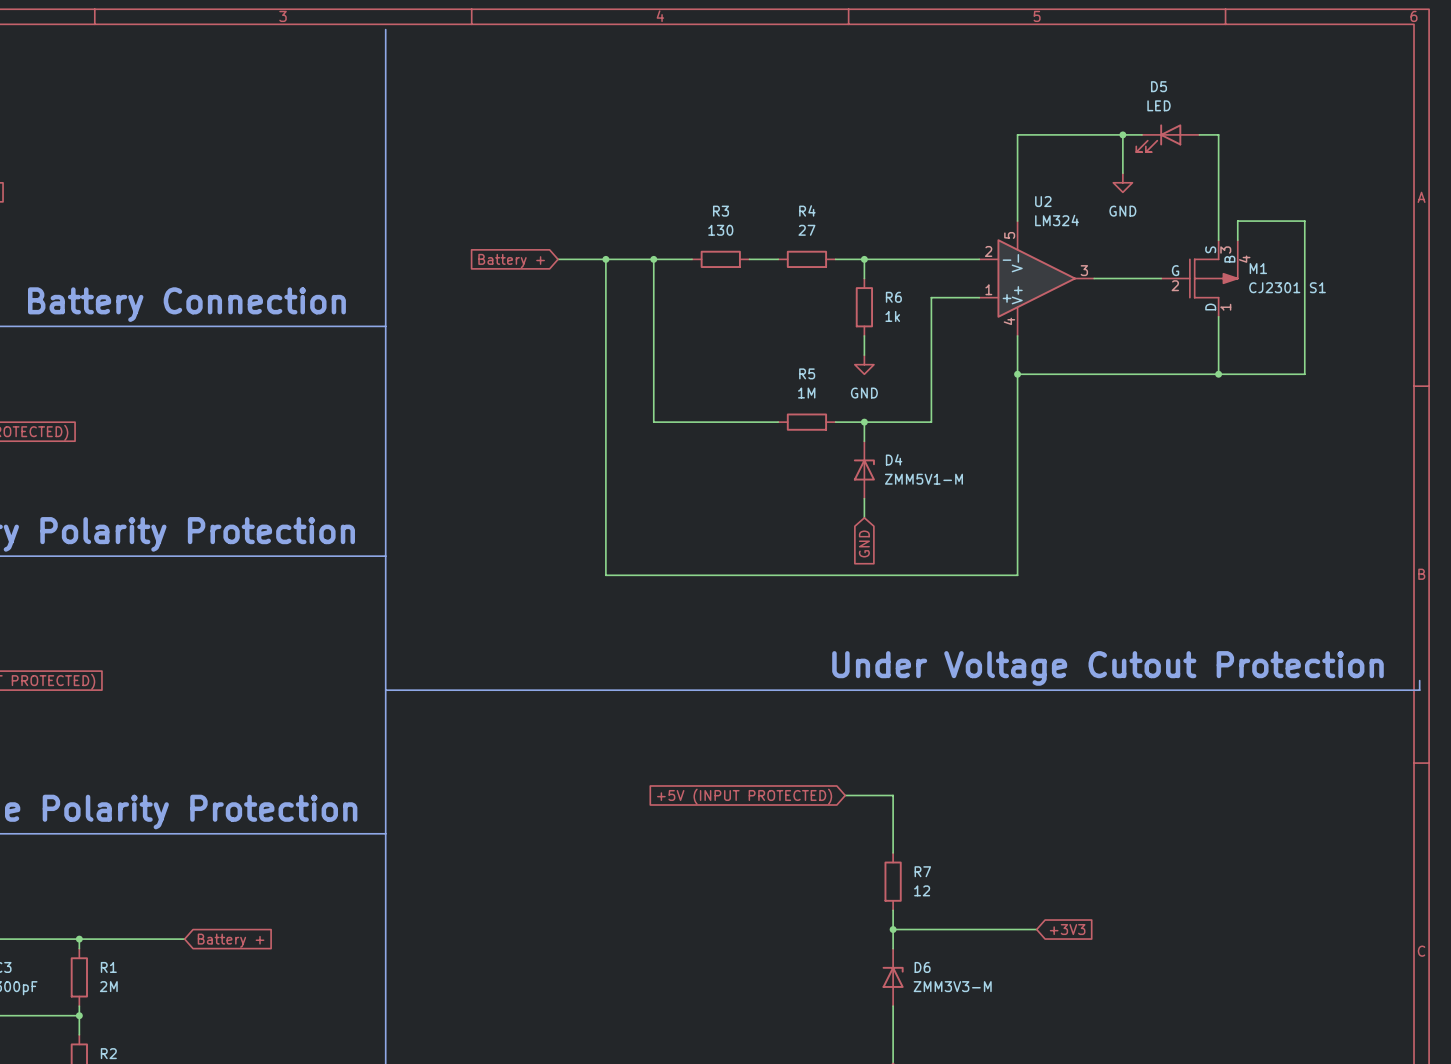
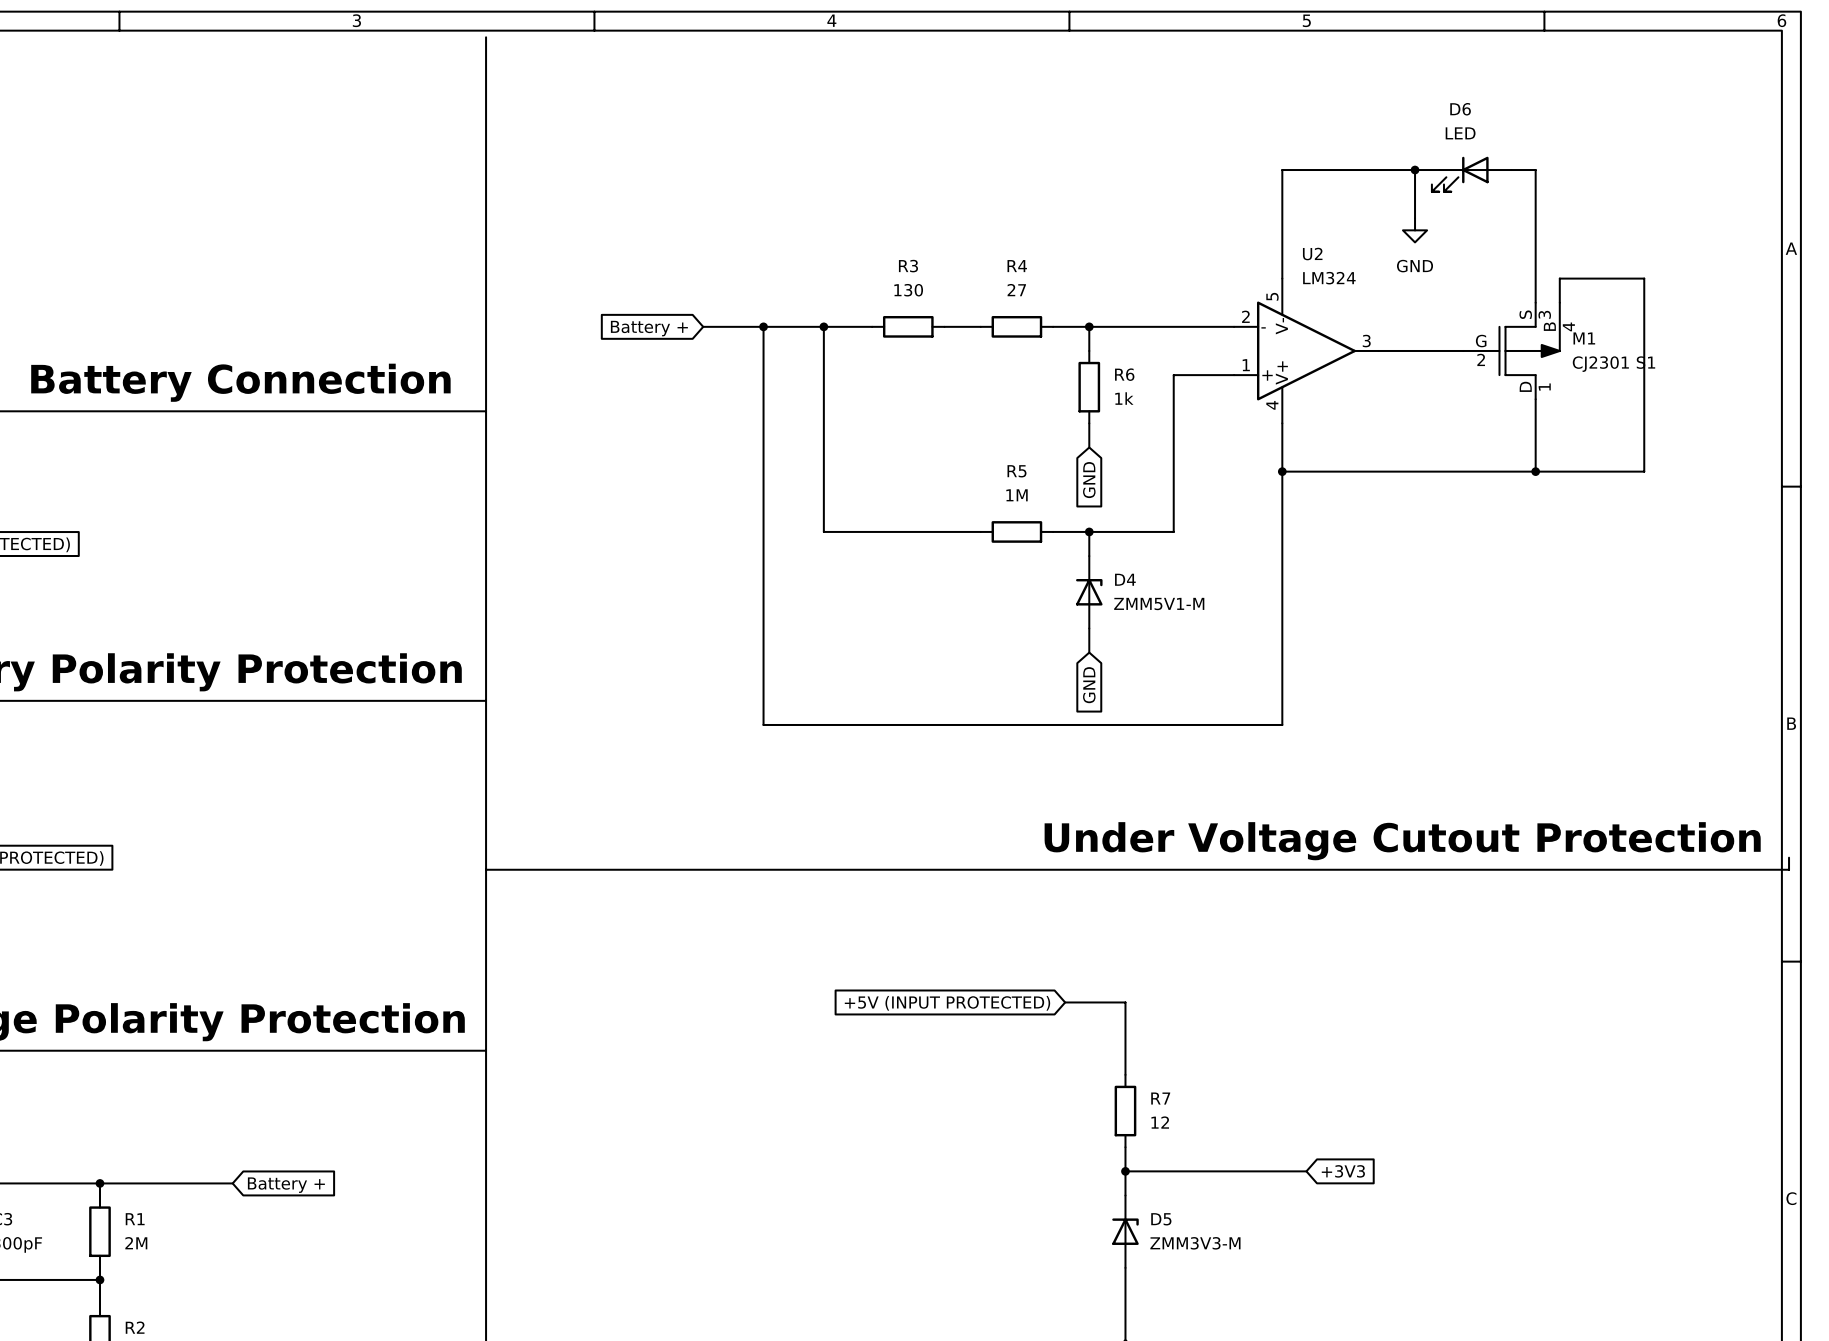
D5 name: D5 (1159, 86) -> D6 (1460, 109)
power symbol: GND (864, 364) -> none
global label: none -> GND (1089, 480)
D6 name: D6 (922, 967) -> D5 (1161, 1219)

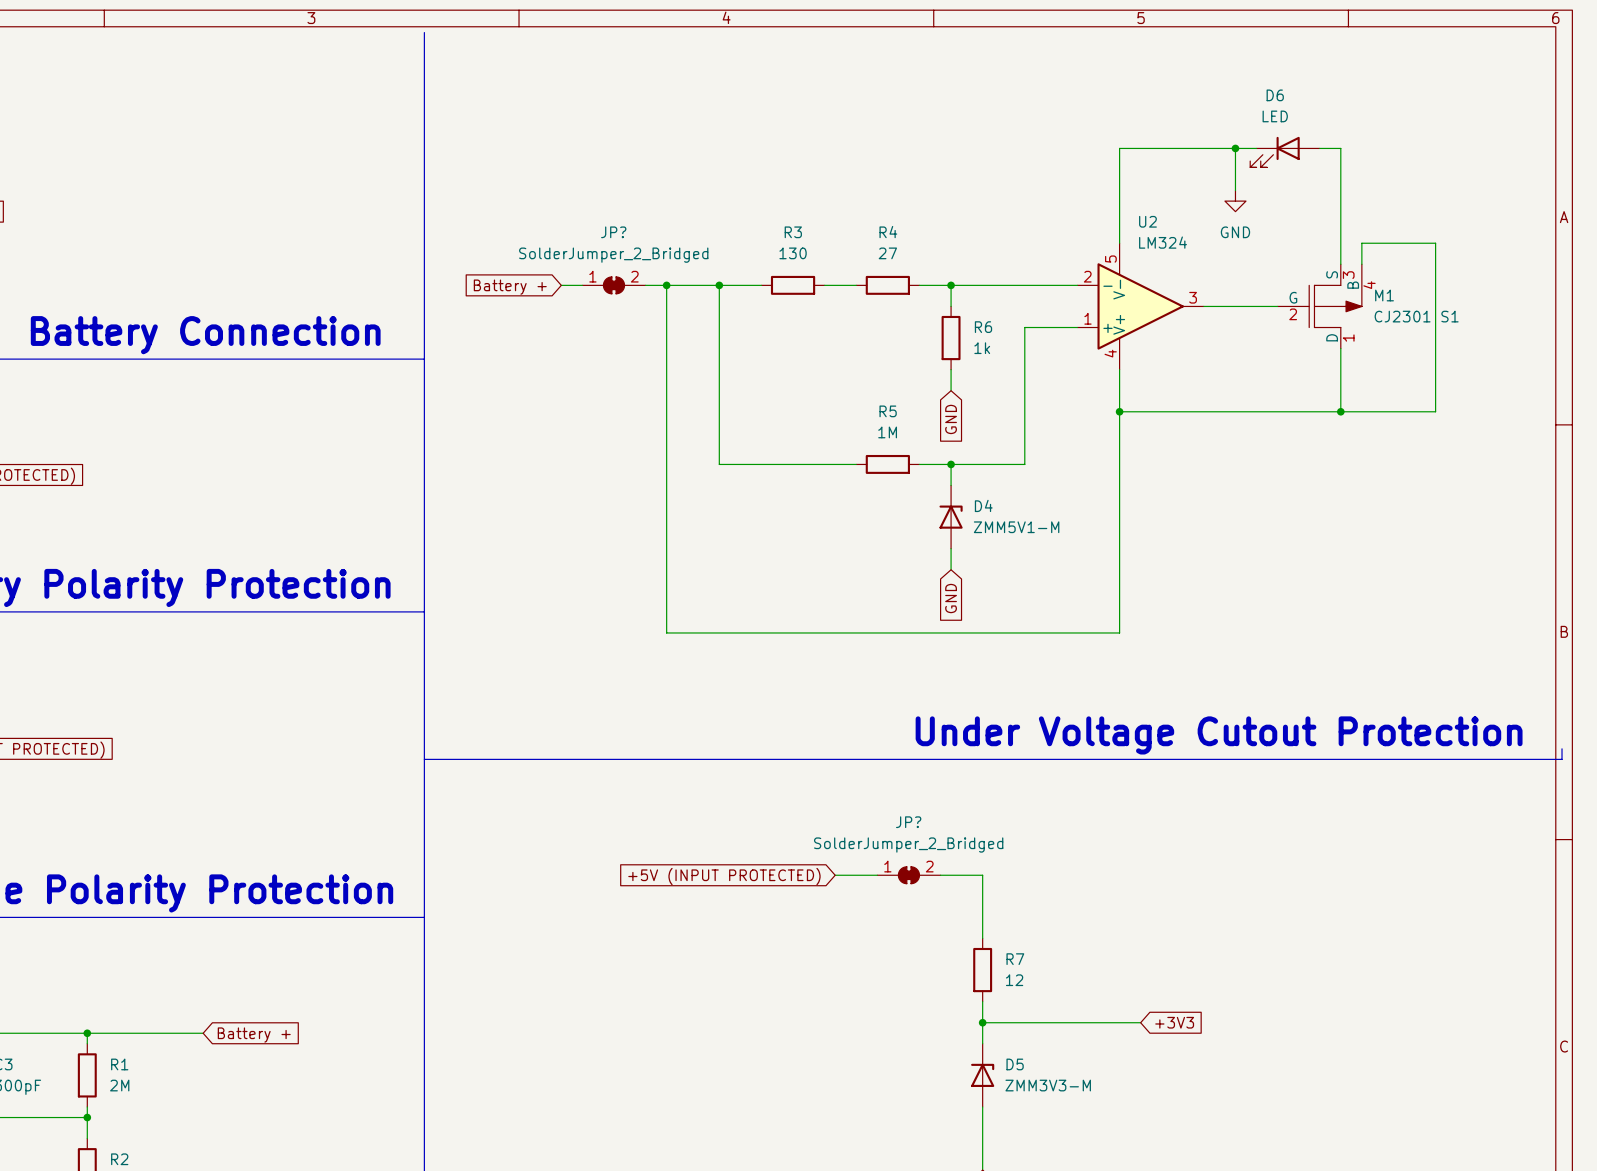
wire: none -> (561, 285) (582, 285)
JP?: none -> SolderJumper_2_Bridged (613, 285)
global label position: Battery + (649, 328) -> Battery + (510, 287)
wire: none -> (835, 875) (877, 875)
JP?: none -> SolderJumper_2_Bridged (908, 875)
global label position: +5V (INPUT PROTECTED) (947, 1003) -> +5V (INPUT PROTECTED) (724, 876)

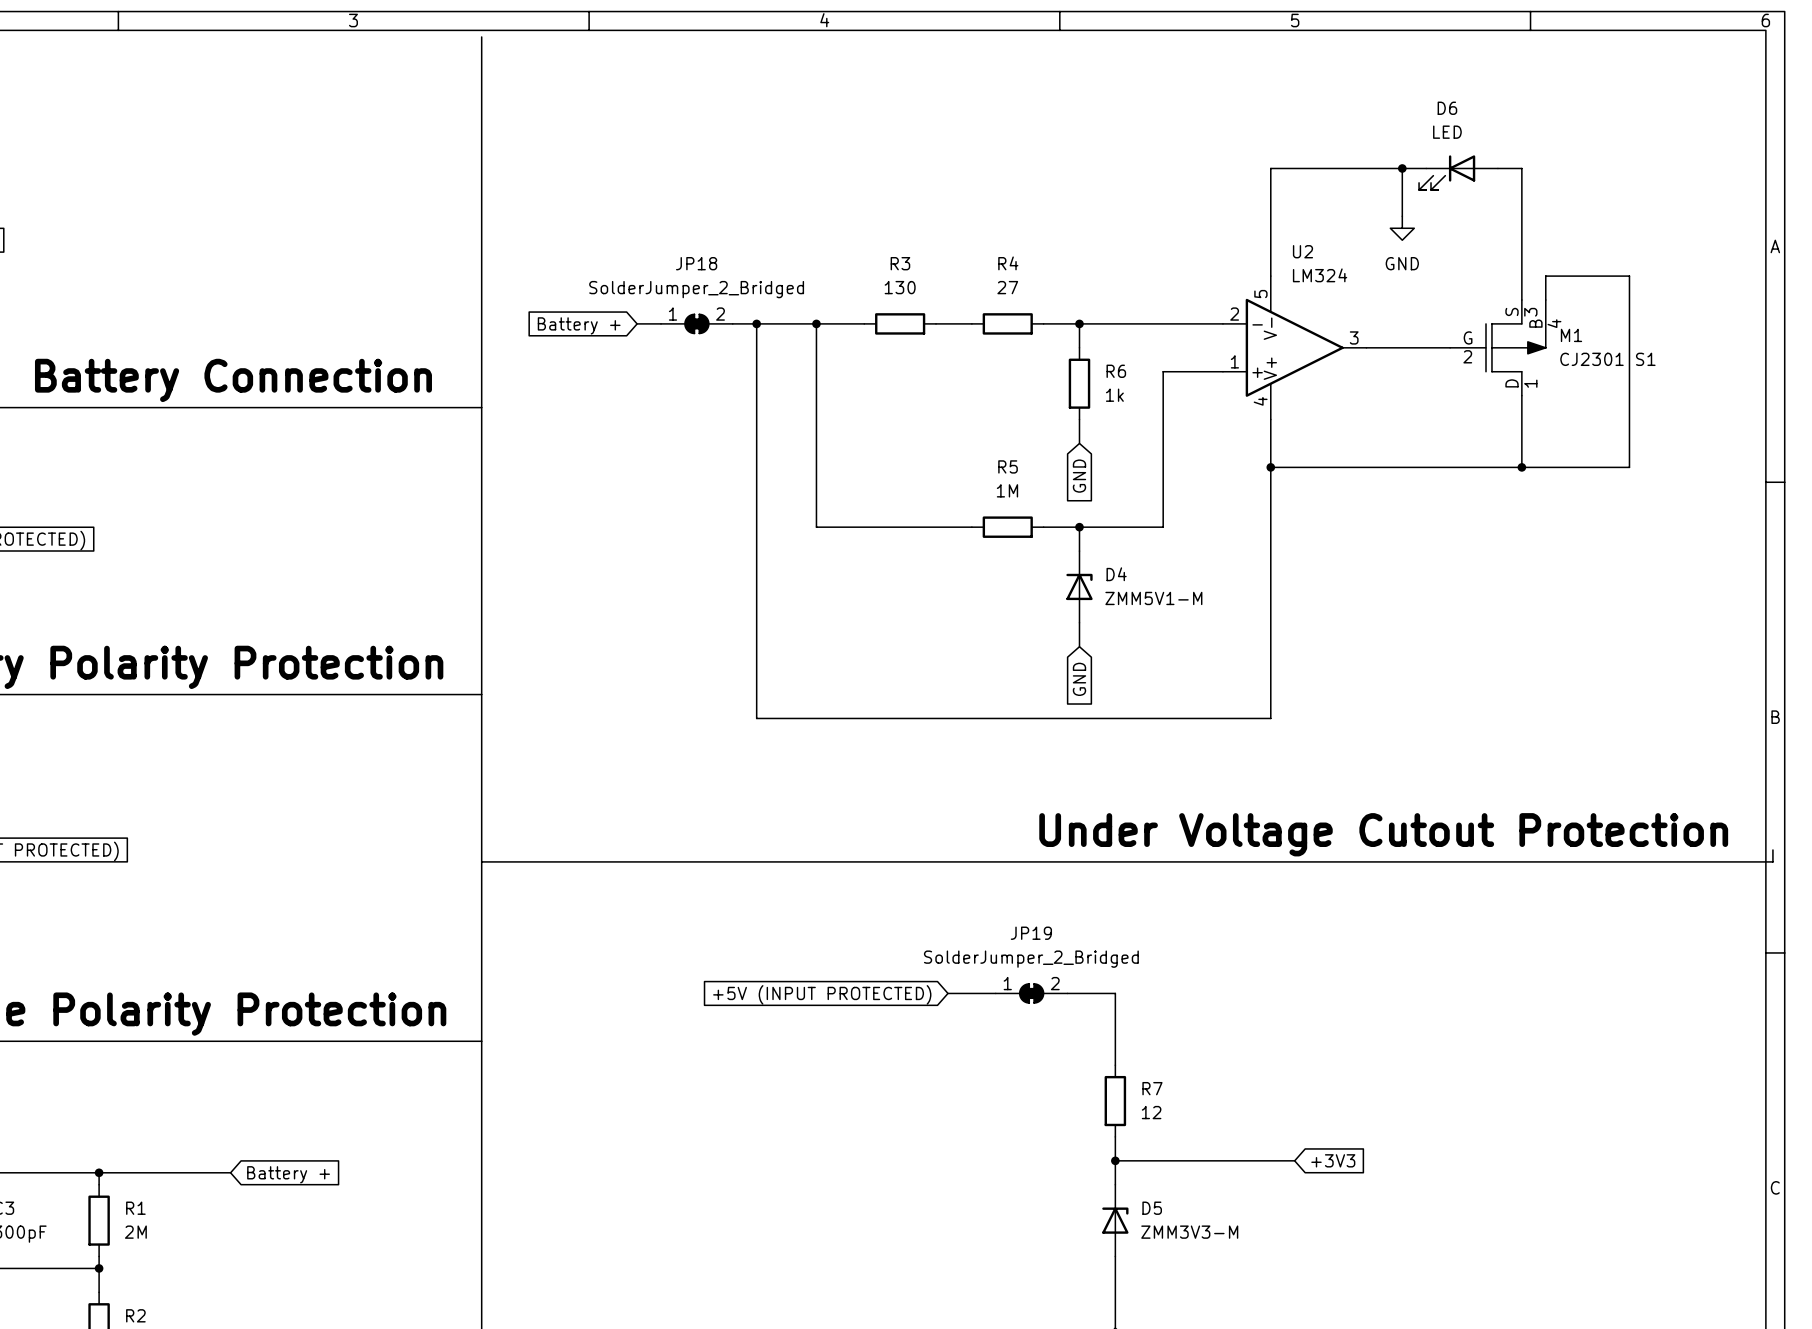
JP? name: JP? (613, 232) -> JP18 (696, 263)
JP? name: JP? (908, 822) -> JP19 (1031, 933)

